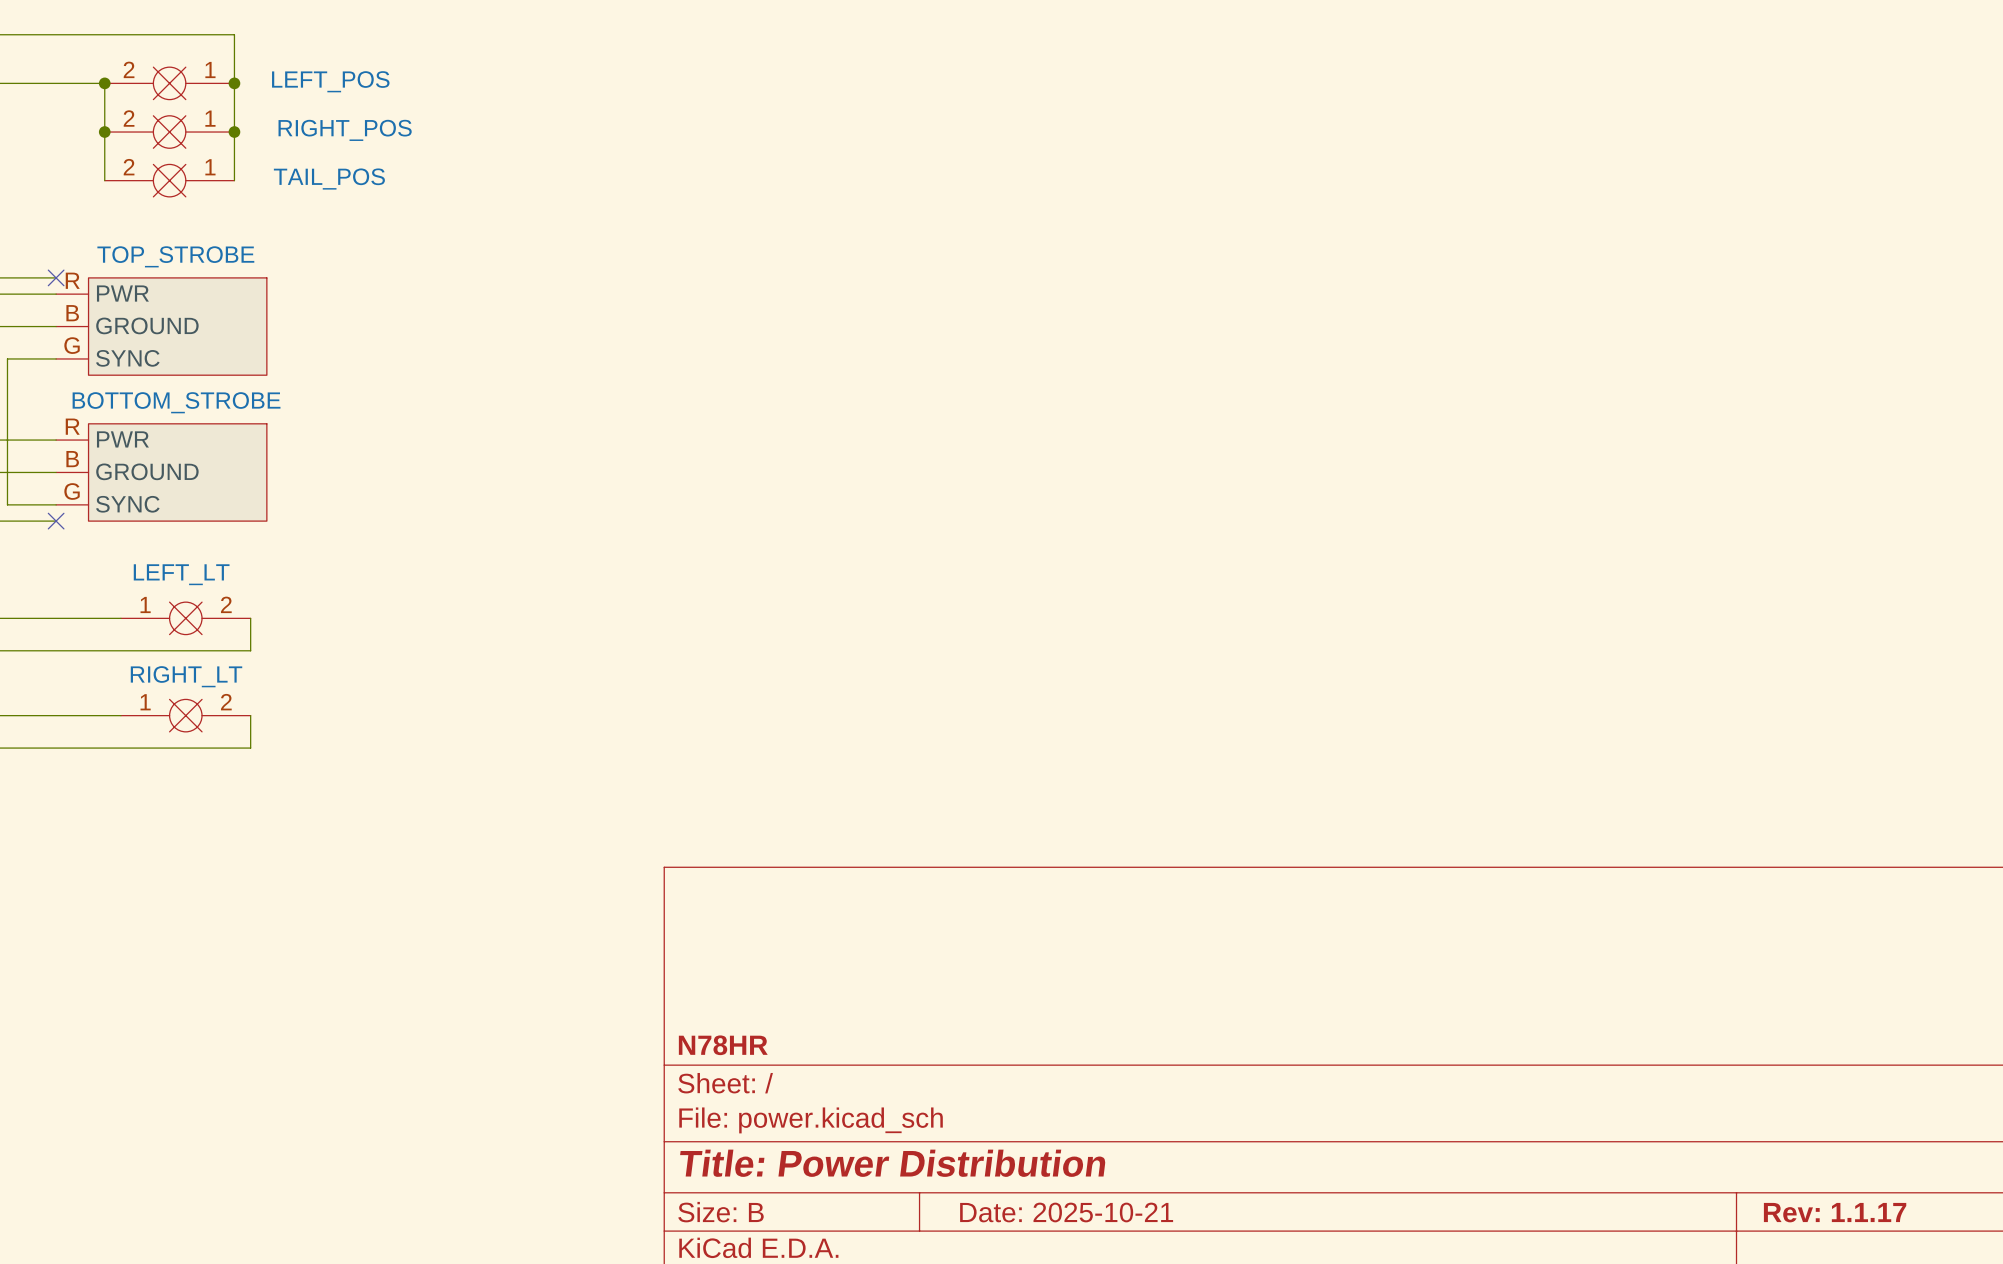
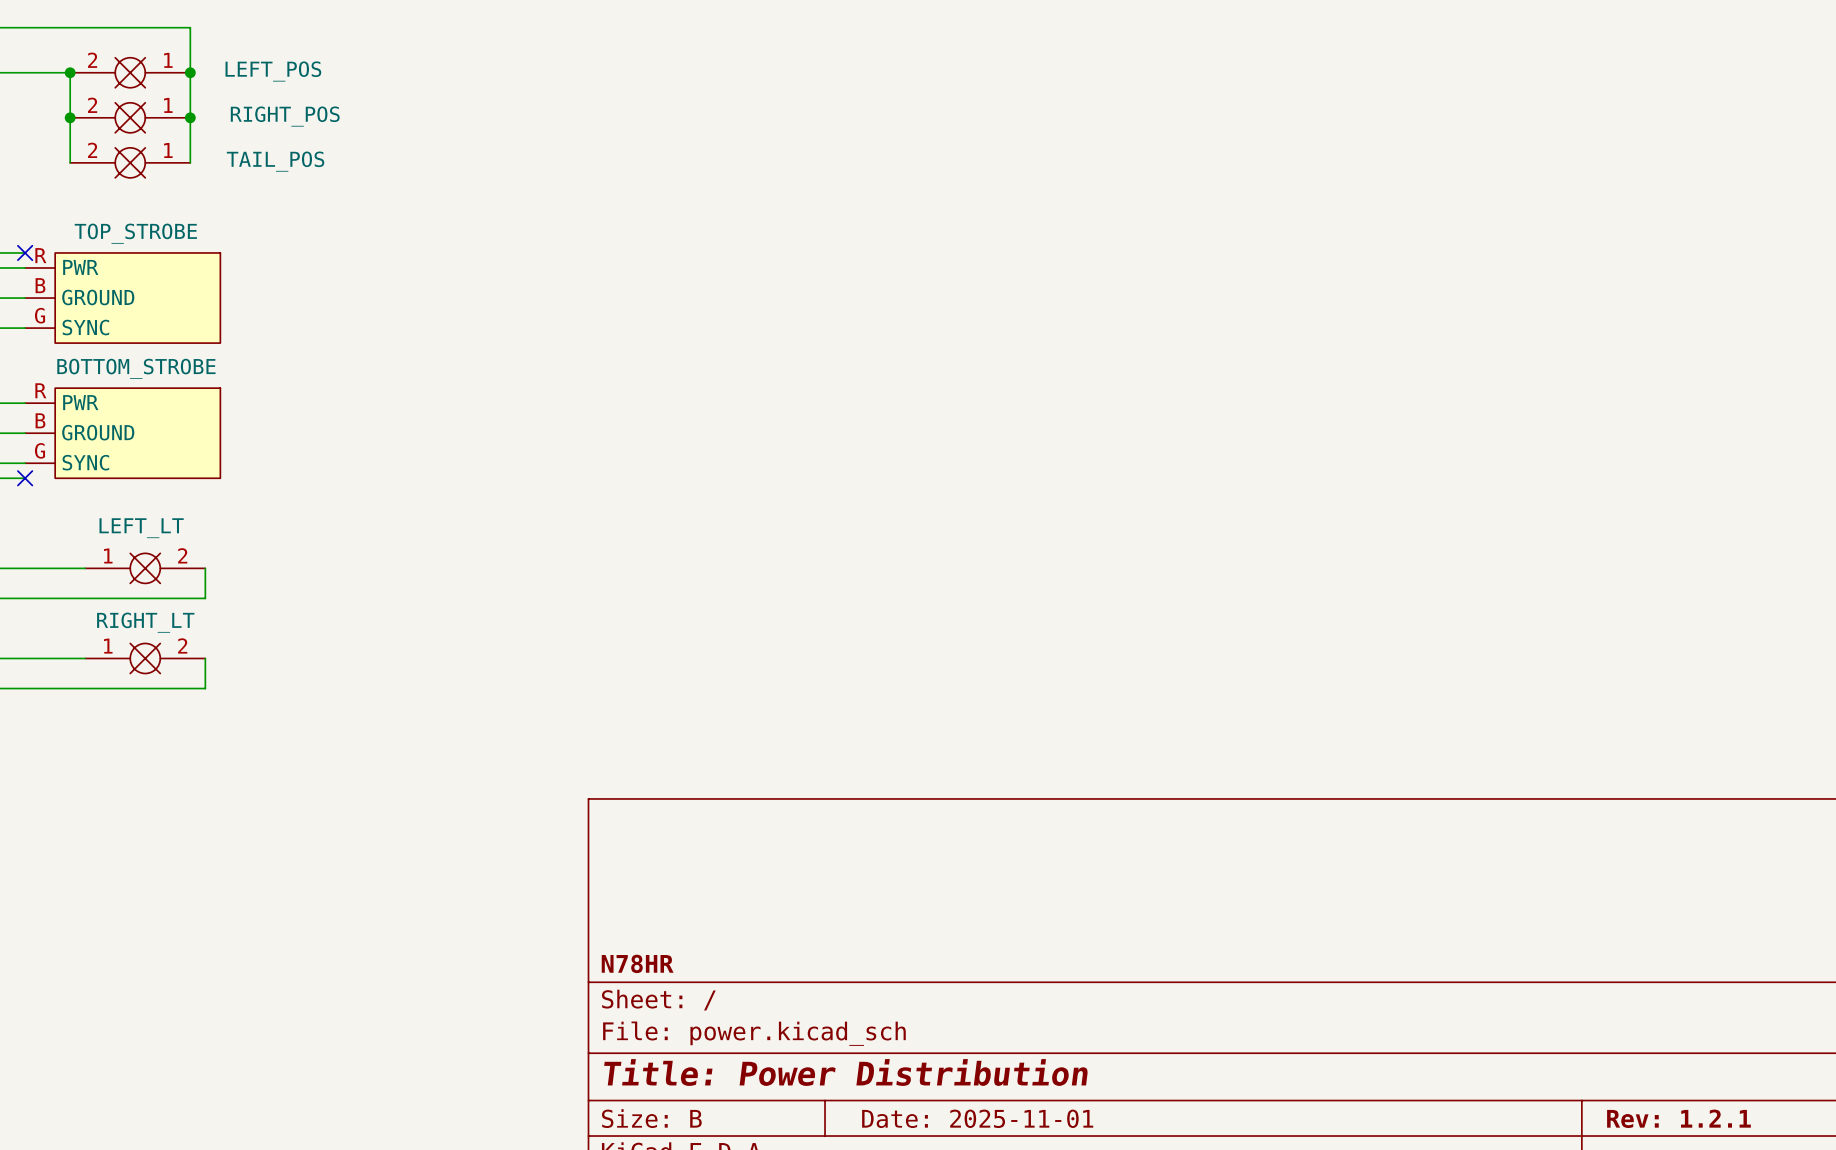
title block: Date: 2025-10-21 (1066, 1212) -> Date: 2025-11-01 (977, 1118)
title block: Rev: 1.1.17 (1835, 1212) -> Rev: 1.2.1 (1678, 1118)

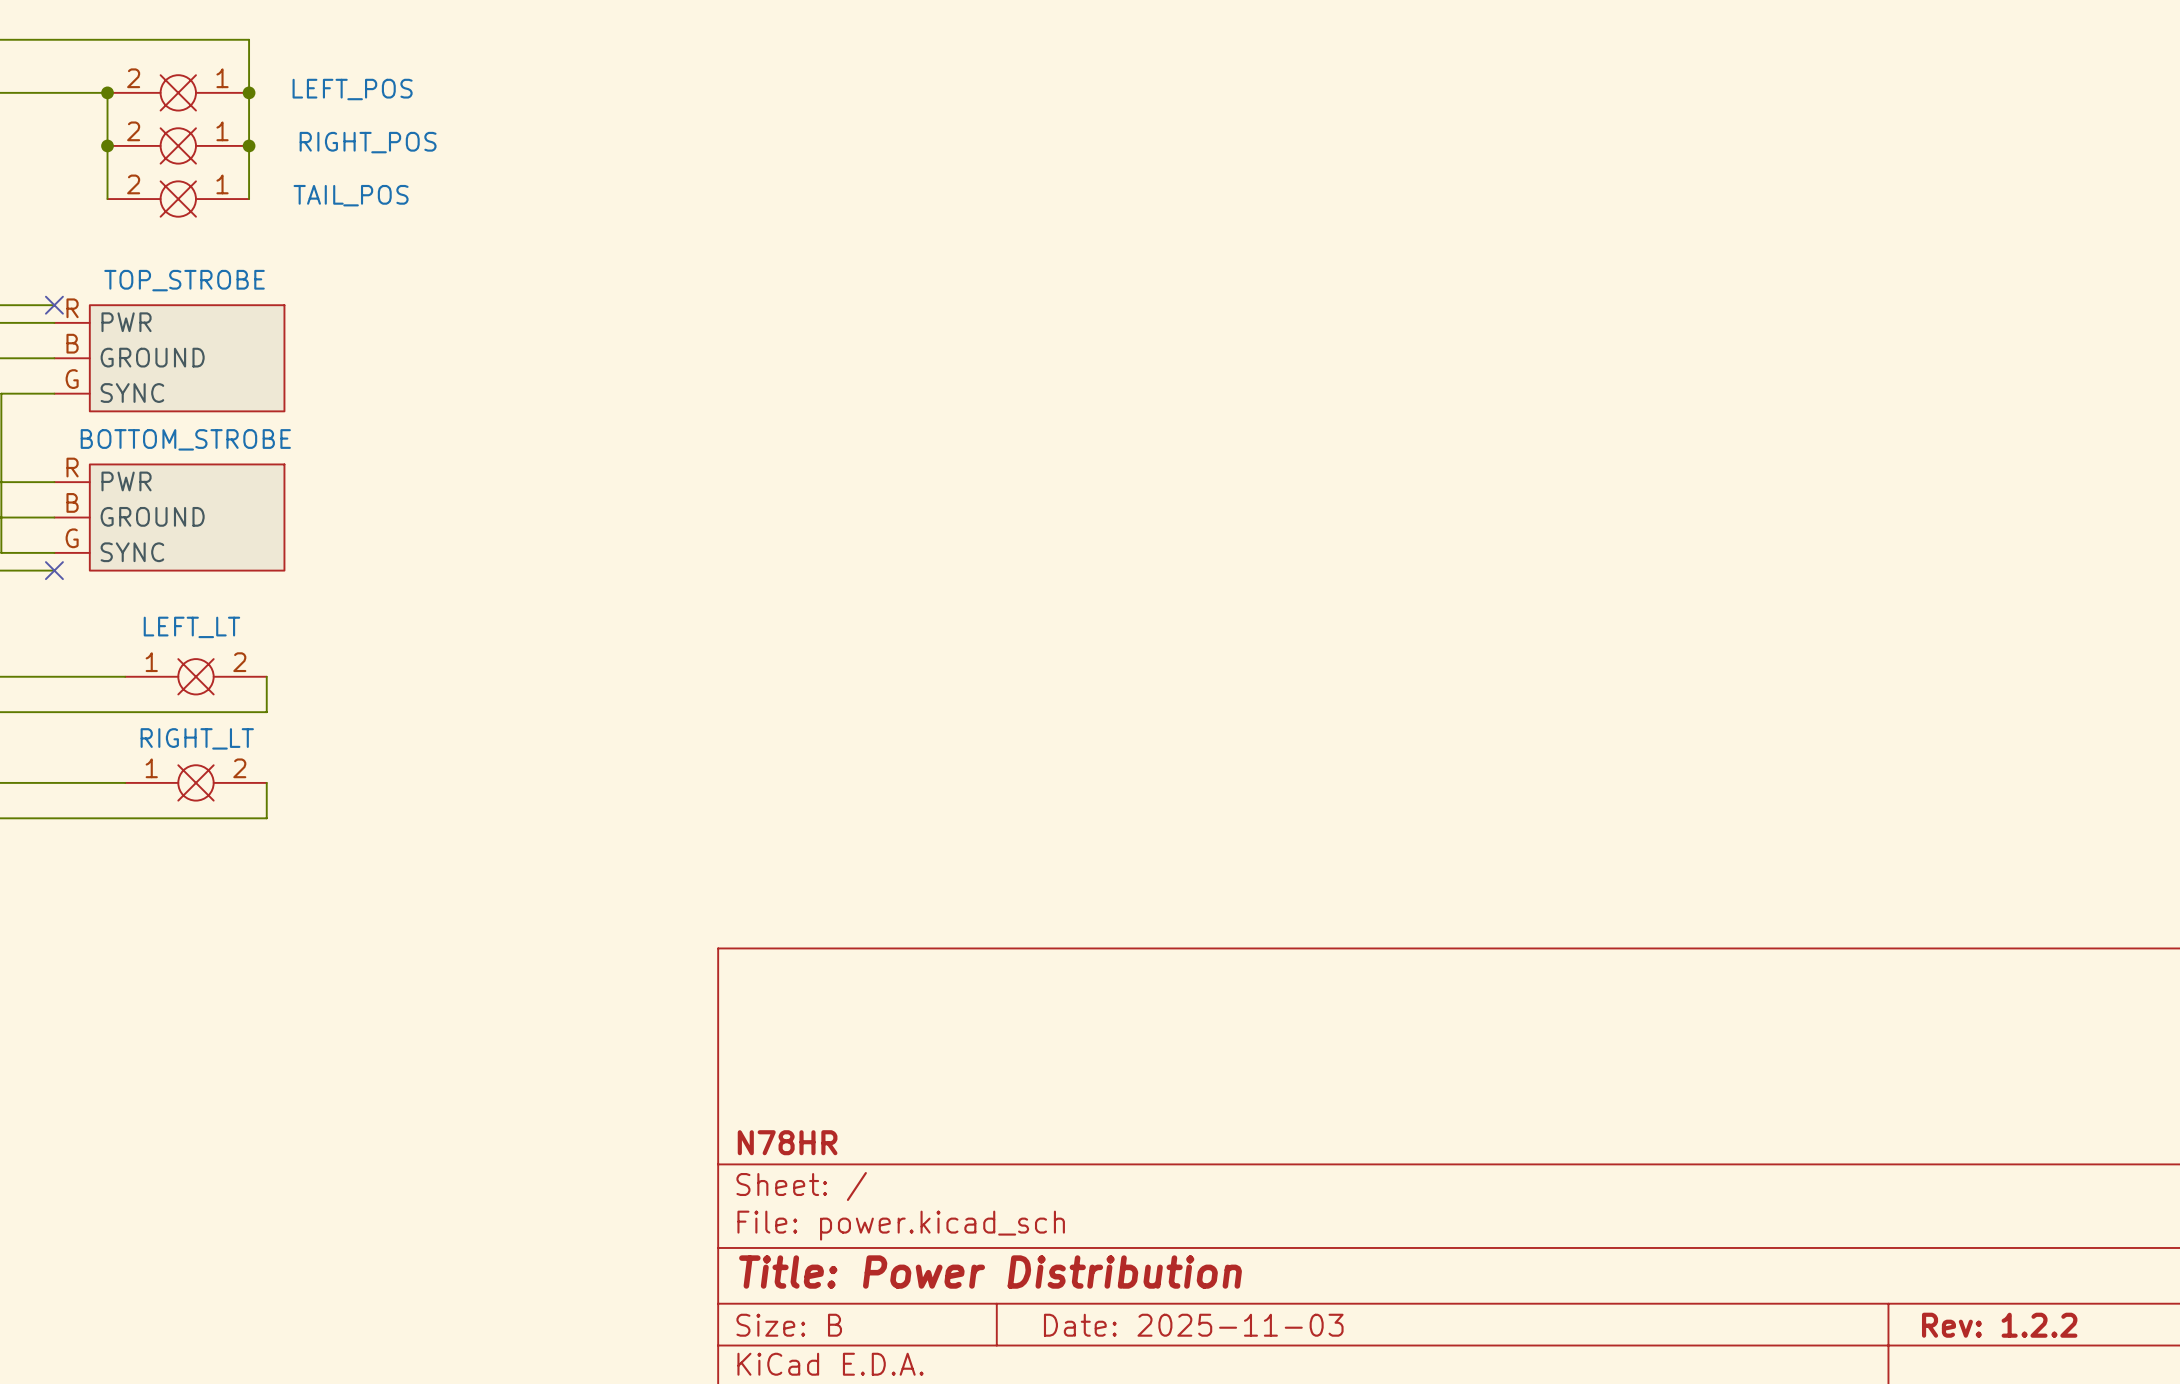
title block: Date: 2025-11-01 (977, 1118) -> Date: 2025-11-03 (1193, 1325)
title block: Rev: 1.2.1 (1678, 1118) -> Rev: 1.2.2 (1999, 1325)

